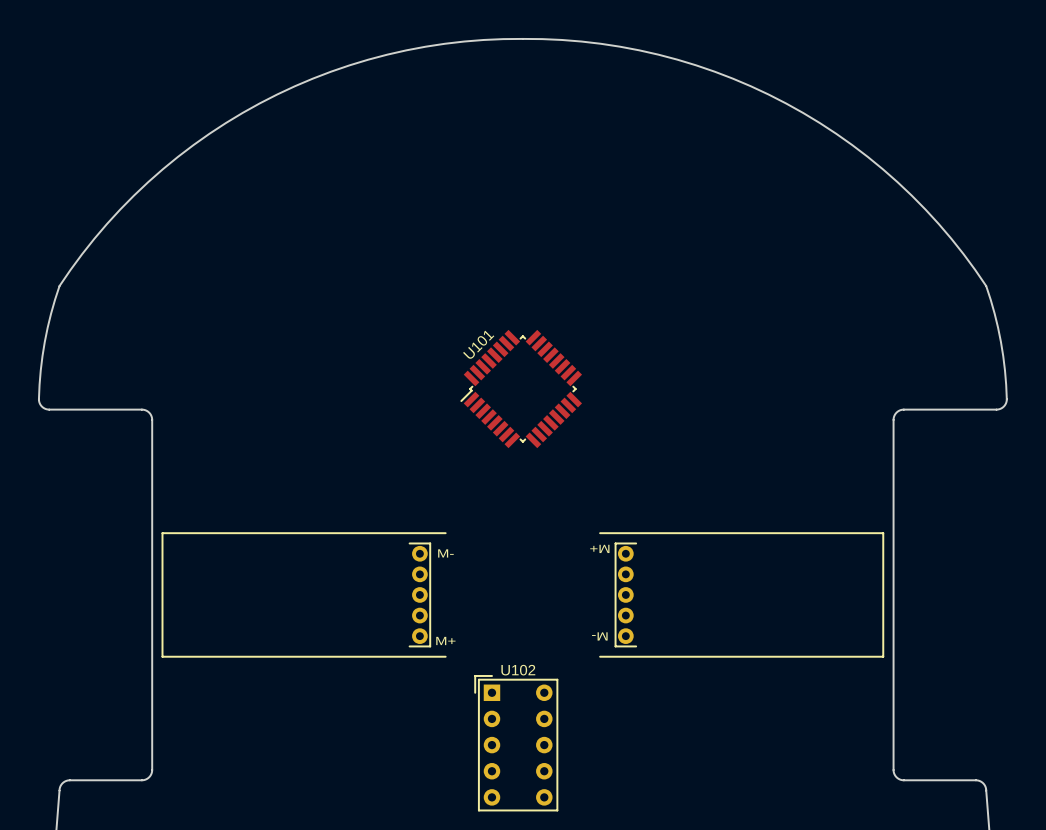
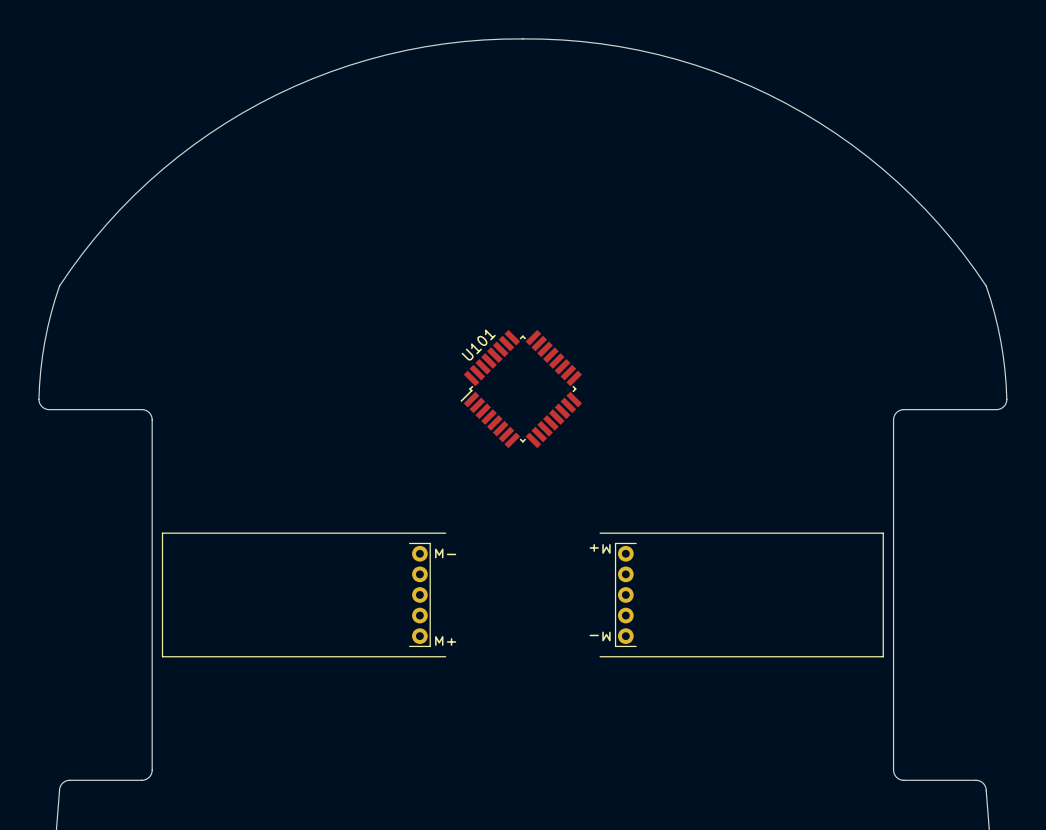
U102: (516, 743) -> none

